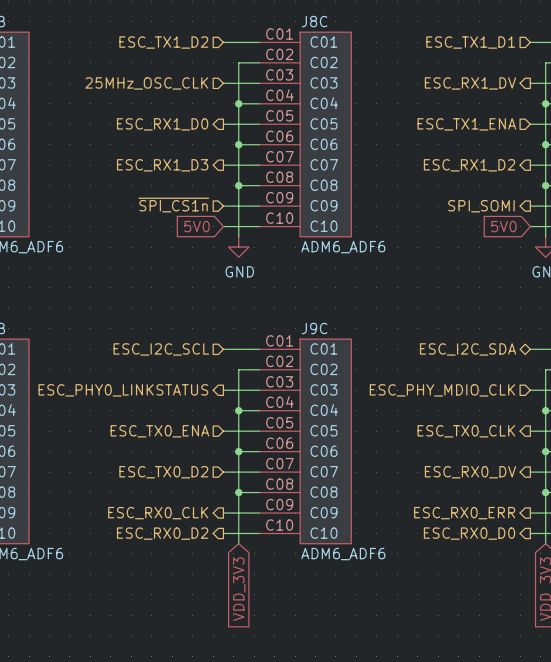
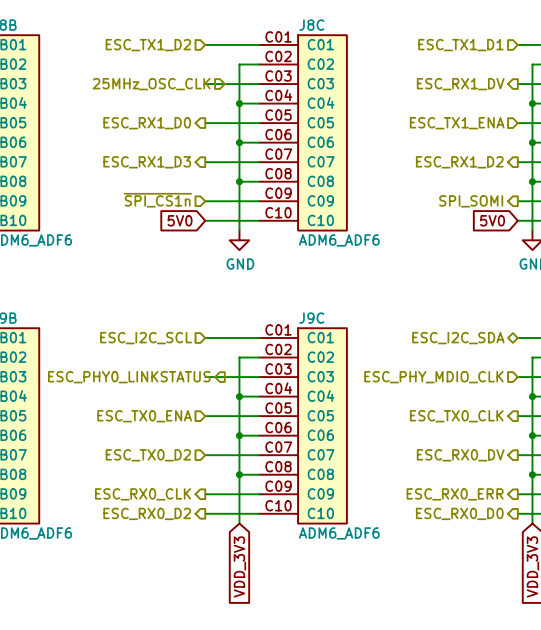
hierarchical label position: ESC_TX1_D2 (163, 42) -> ESC_TX1_D2 (148, 45)
wire: none -> (205, 44) (224, 44)
wire: none -> (205, 84) (224, 84)
hierarchical label position: ESC_RX1_D0 (162, 124) -> ESC_RX1_D0 (147, 123)
wire: none -> (205, 123) (224, 123)
hierarchical label position: ESC_RX1_D3 (162, 165) -> ESC_RX1_D3 (147, 162)
wire: none -> (205, 162) (224, 162)
hierarchical label position: ~{SPI_CS1n} (173, 205) -> ~{SPI_CS1n} (157, 200)
wire: none -> (205, 201) (224, 201)
global label position: 5V0 (196, 226) -> 5V0 (180, 220)
wire: none -> (205, 220) (224, 220)
hierarchical label position: ESC_I2C_SCL (161, 349) -> ESC_I2C_SCL (146, 338)
wire: none -> (205, 337) (224, 337)
wire: none -> (205, 377) (224, 377)
hierarchical label position: ESC_TX0_ENA (159, 431) -> ESC_TX0_ENA (144, 416)
wire: none -> (205, 416) (224, 416)
hierarchical label position: ESC_TX0_D2 (163, 472) -> ESC_TX0_D2 (148, 455)
wire: none -> (205, 455) (224, 455)
hierarchical label position: ESC_RX0_CLK (158, 513) -> ESC_RX0_CLK (143, 494)
wire: none -> (205, 494) (224, 494)
hierarchical label position: ESC_RX0_D2 (162, 533) -> ESC_RX0_D2 (147, 513)
wire: none -> (205, 513) (224, 513)

